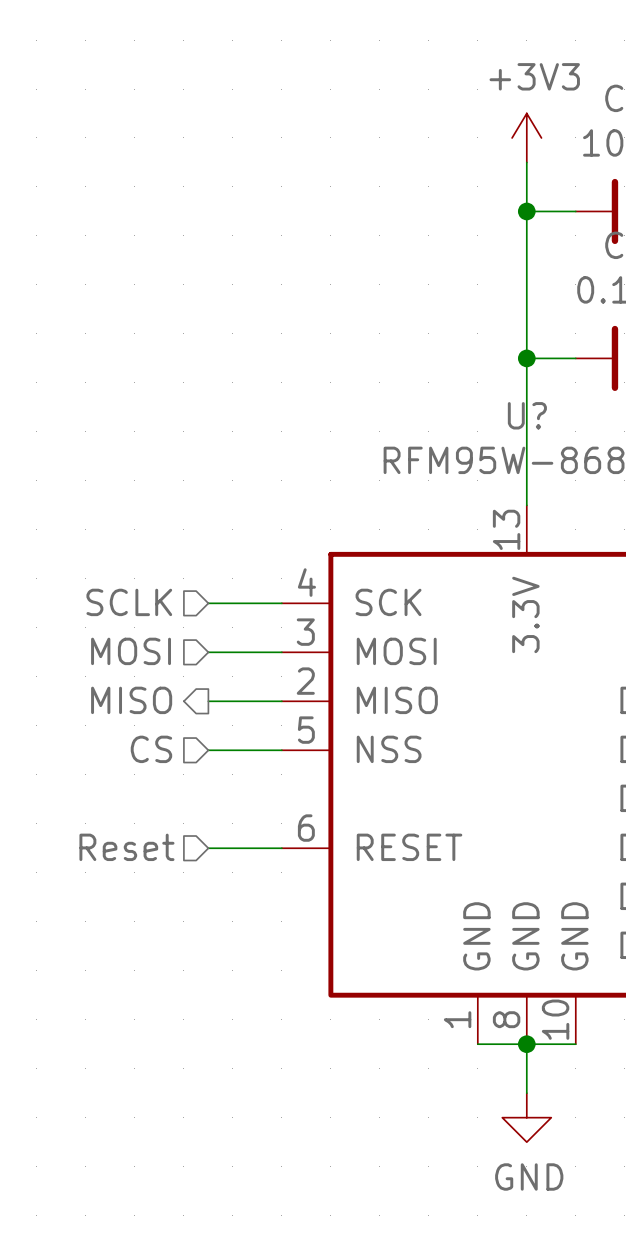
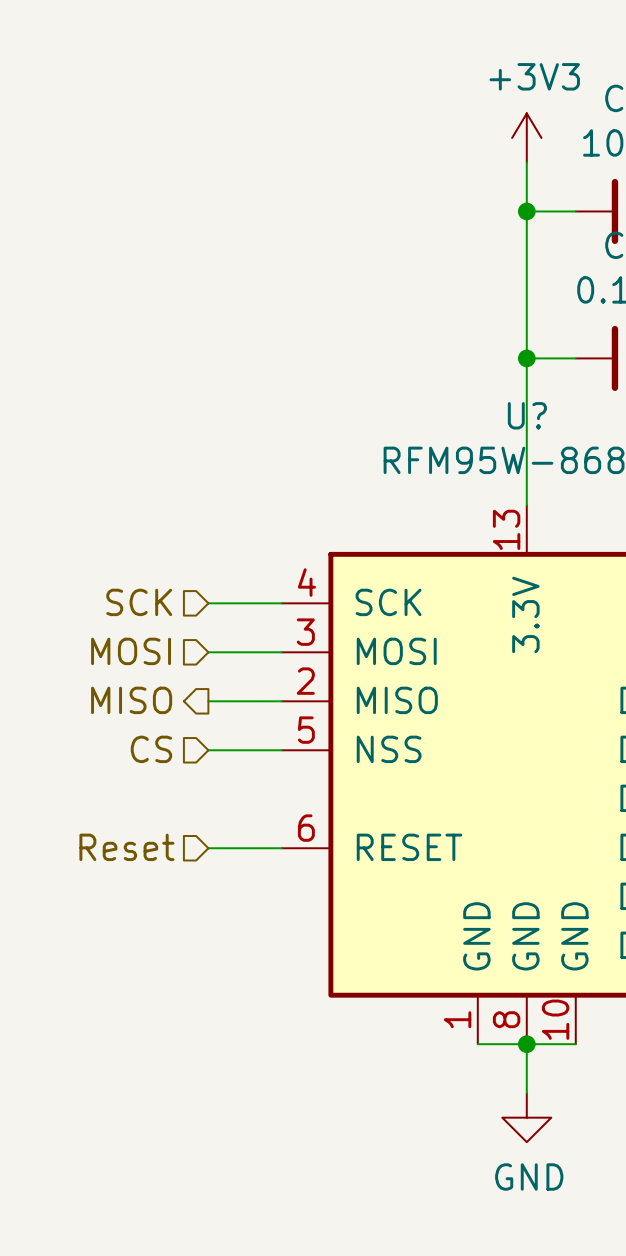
hierarchical label: SCLK (129, 602) -> SCK (139, 602)

